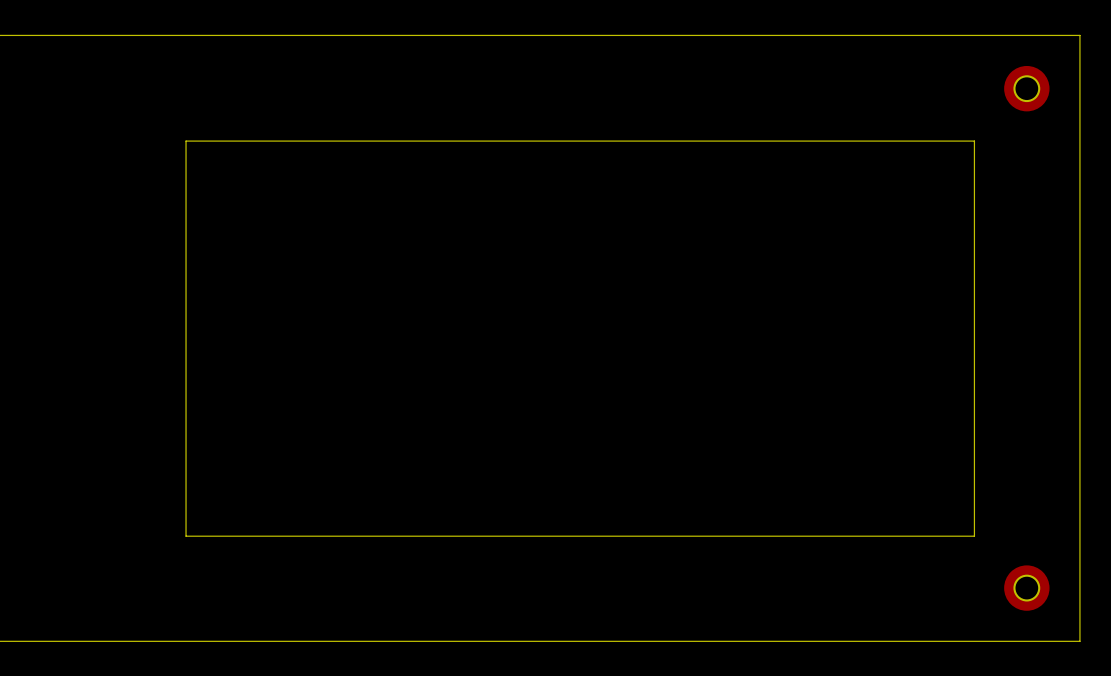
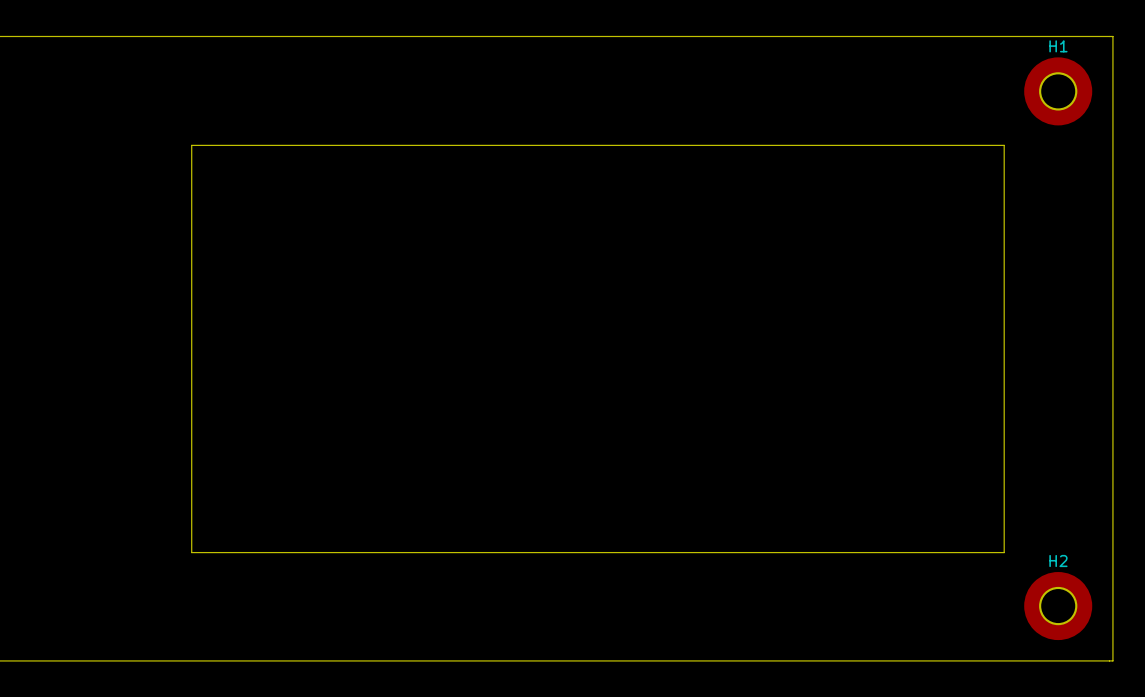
part: (1026, 88) -> none
H1: none -> (1058, 91)
part: (1026, 588) -> none
H2: none -> (1058, 606)

